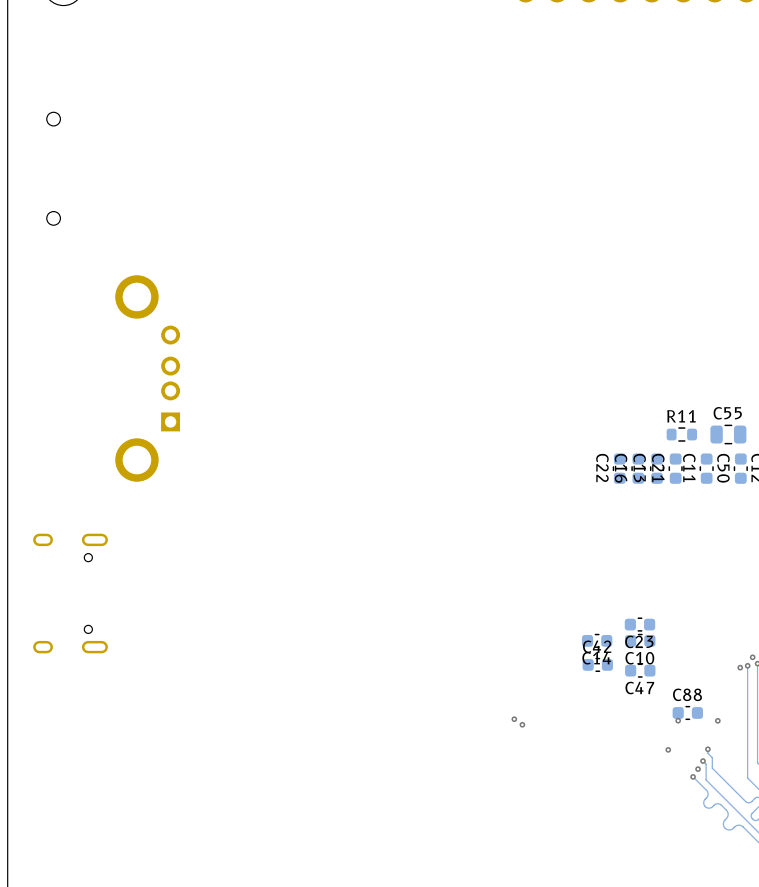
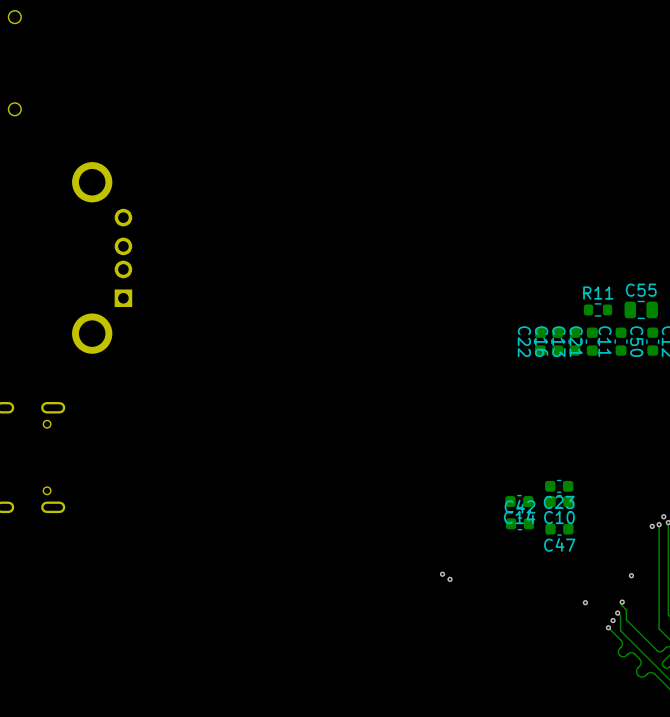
C88: (687, 712) -> none
via: (678, 720) -> none

